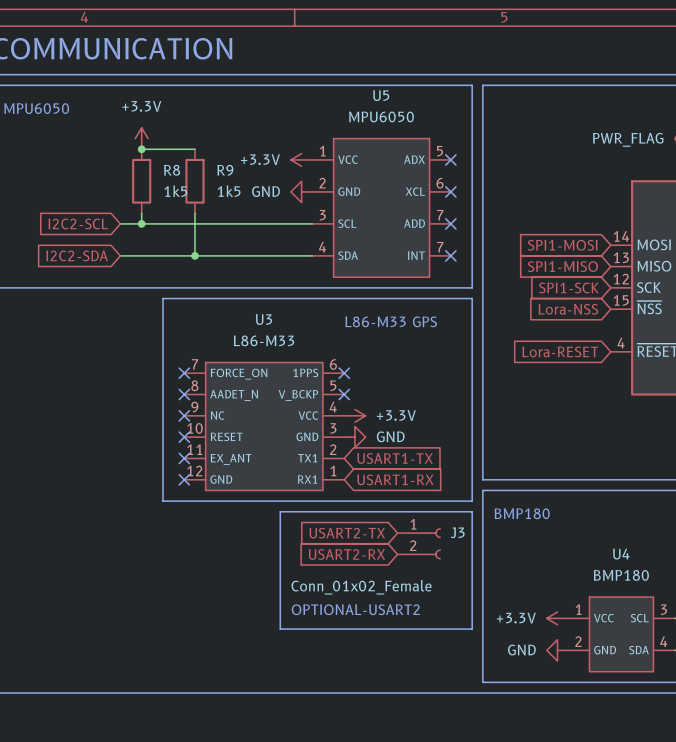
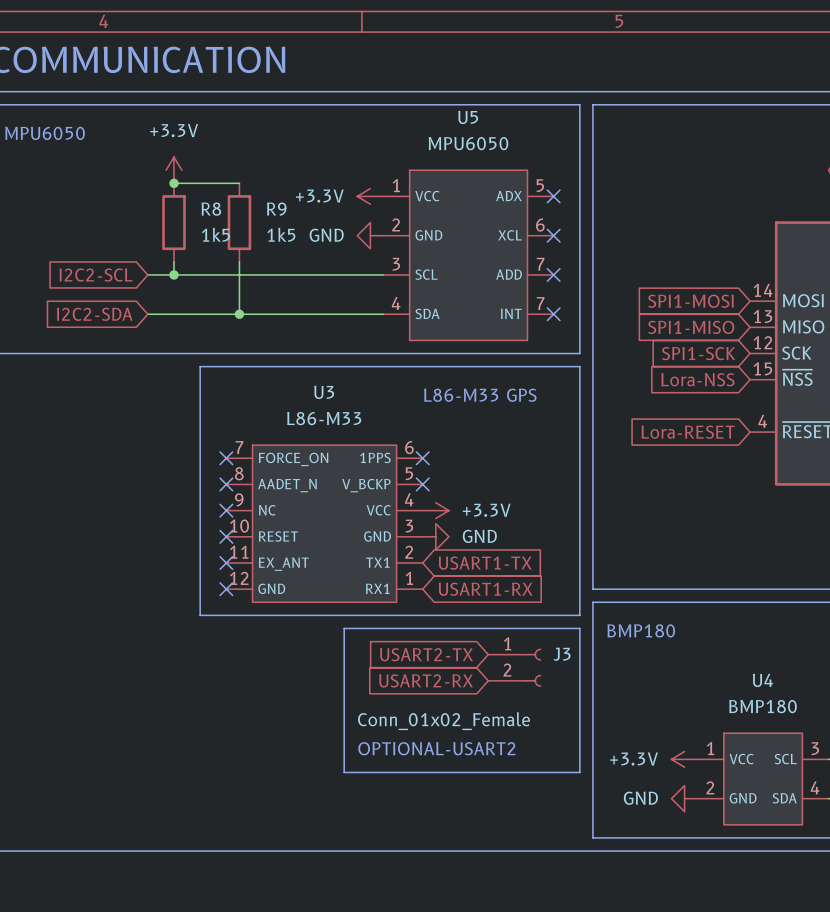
power symbol text: PWR_FLAG (628, 139) -> none

